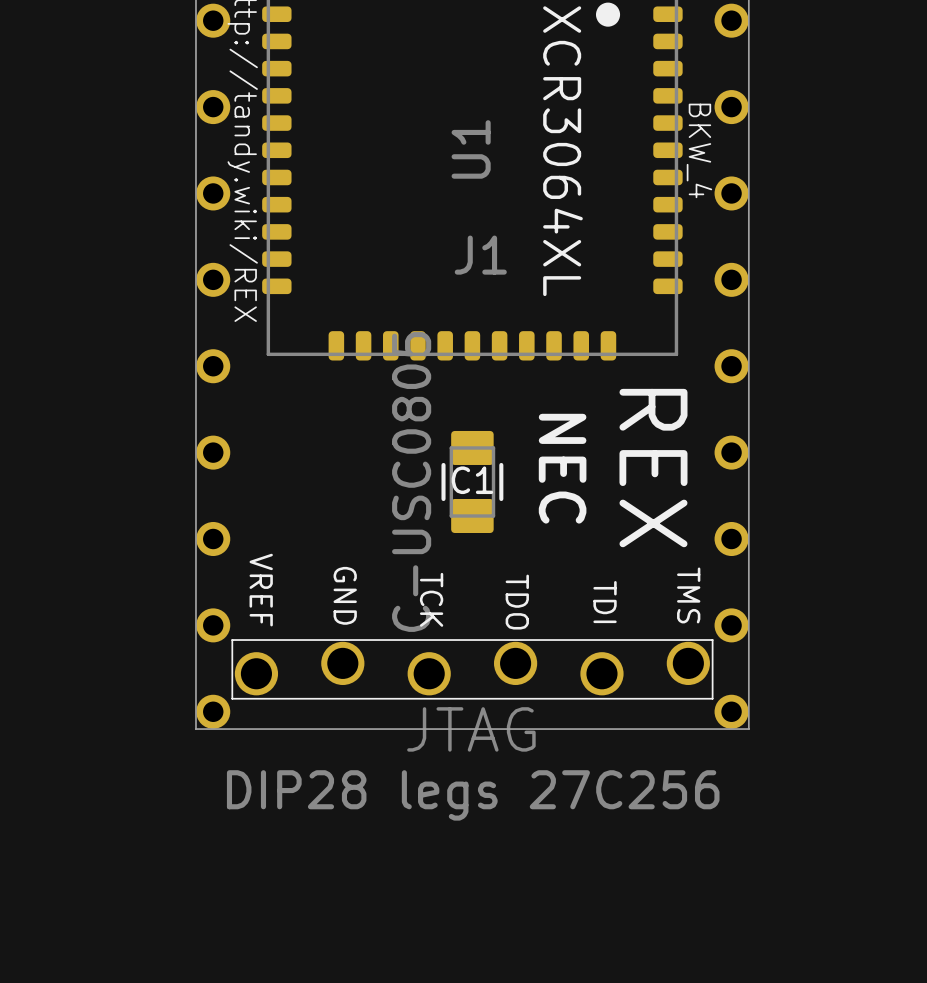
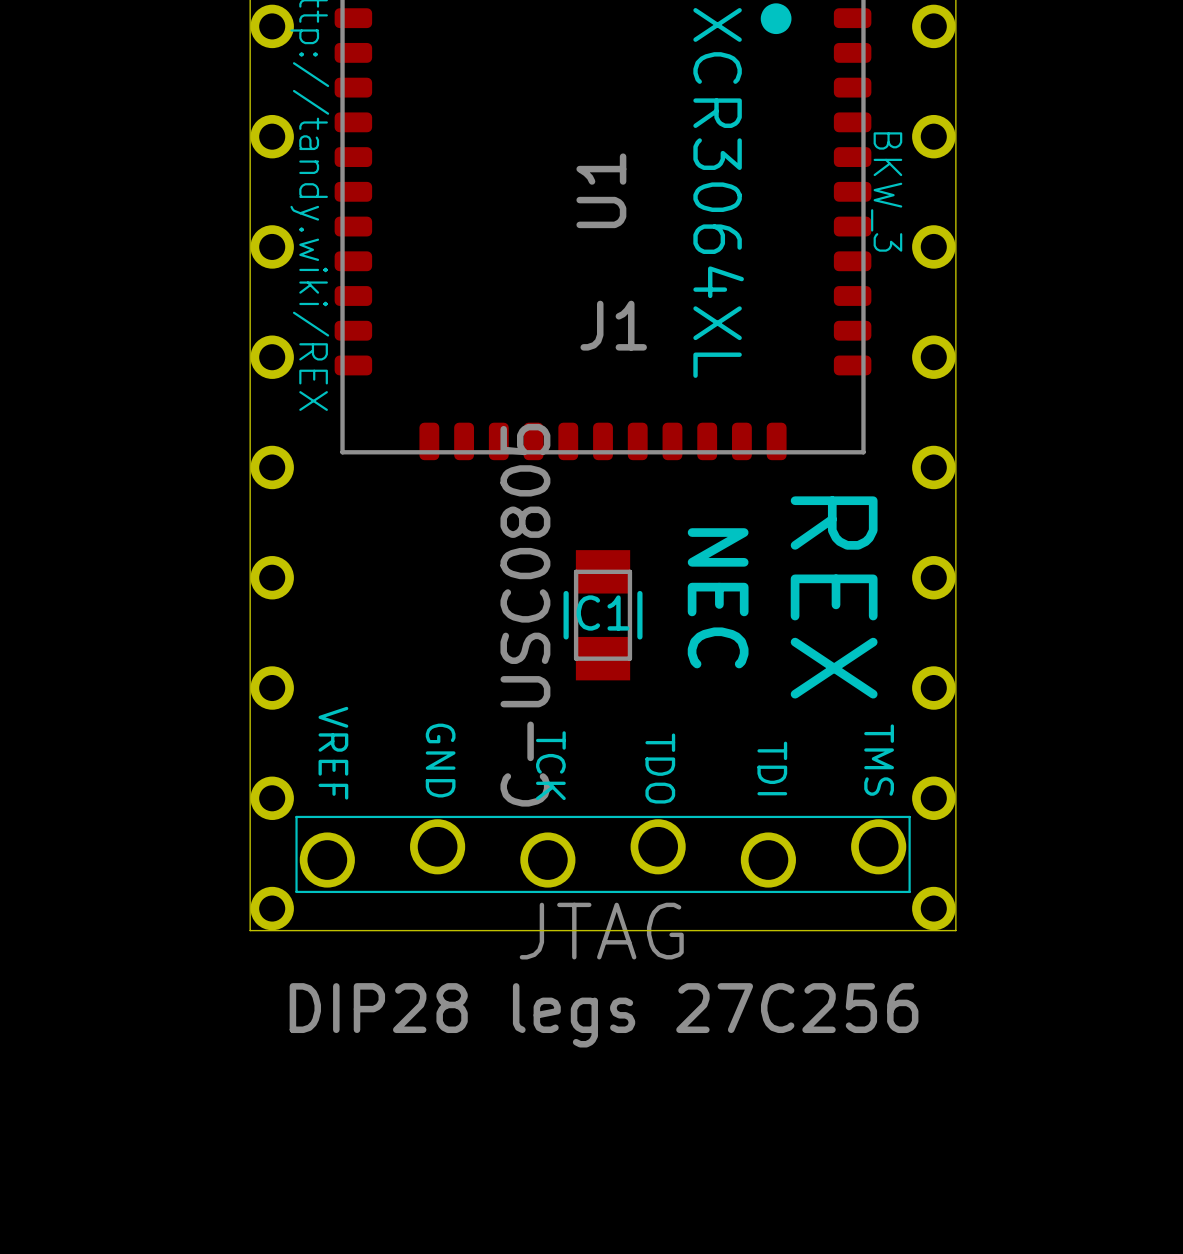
text: BKW_4 (699, 150) -> BKW_3 (886, 192)
C1 footprint: [441, 430, 504, 534] -> [563, 550, 643, 681]

